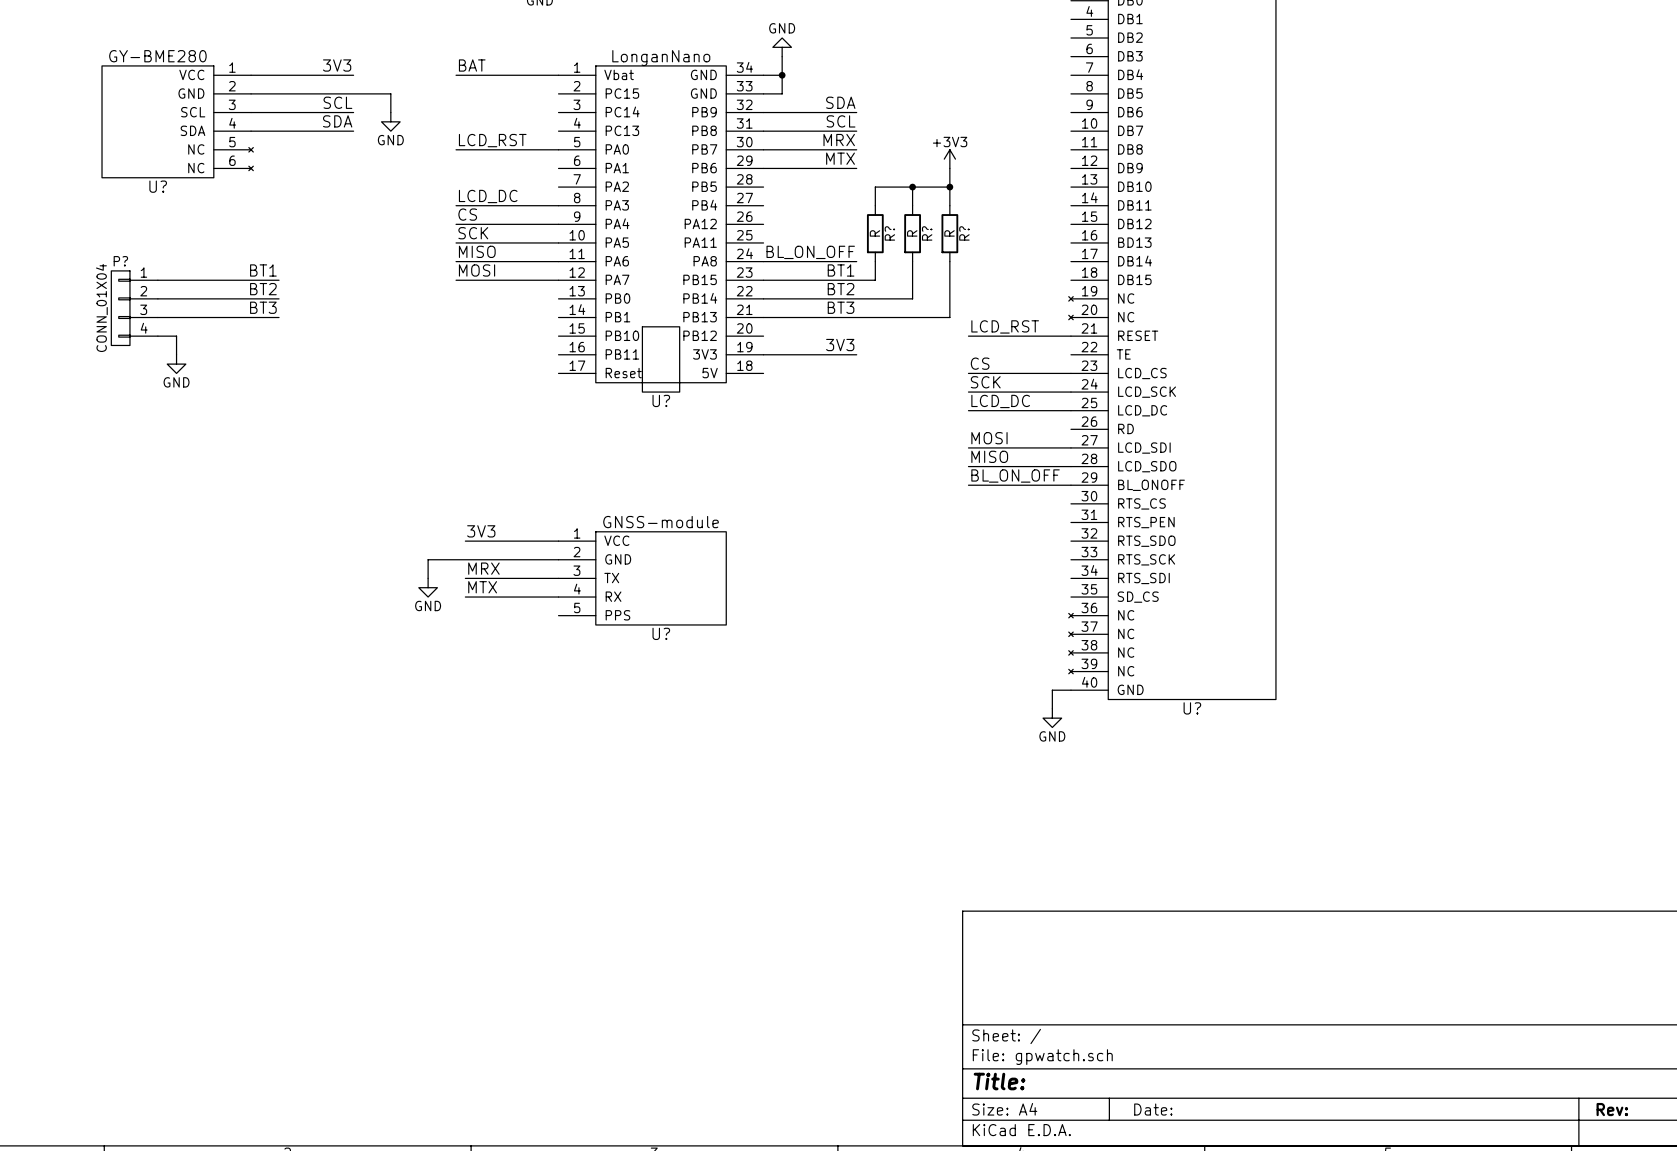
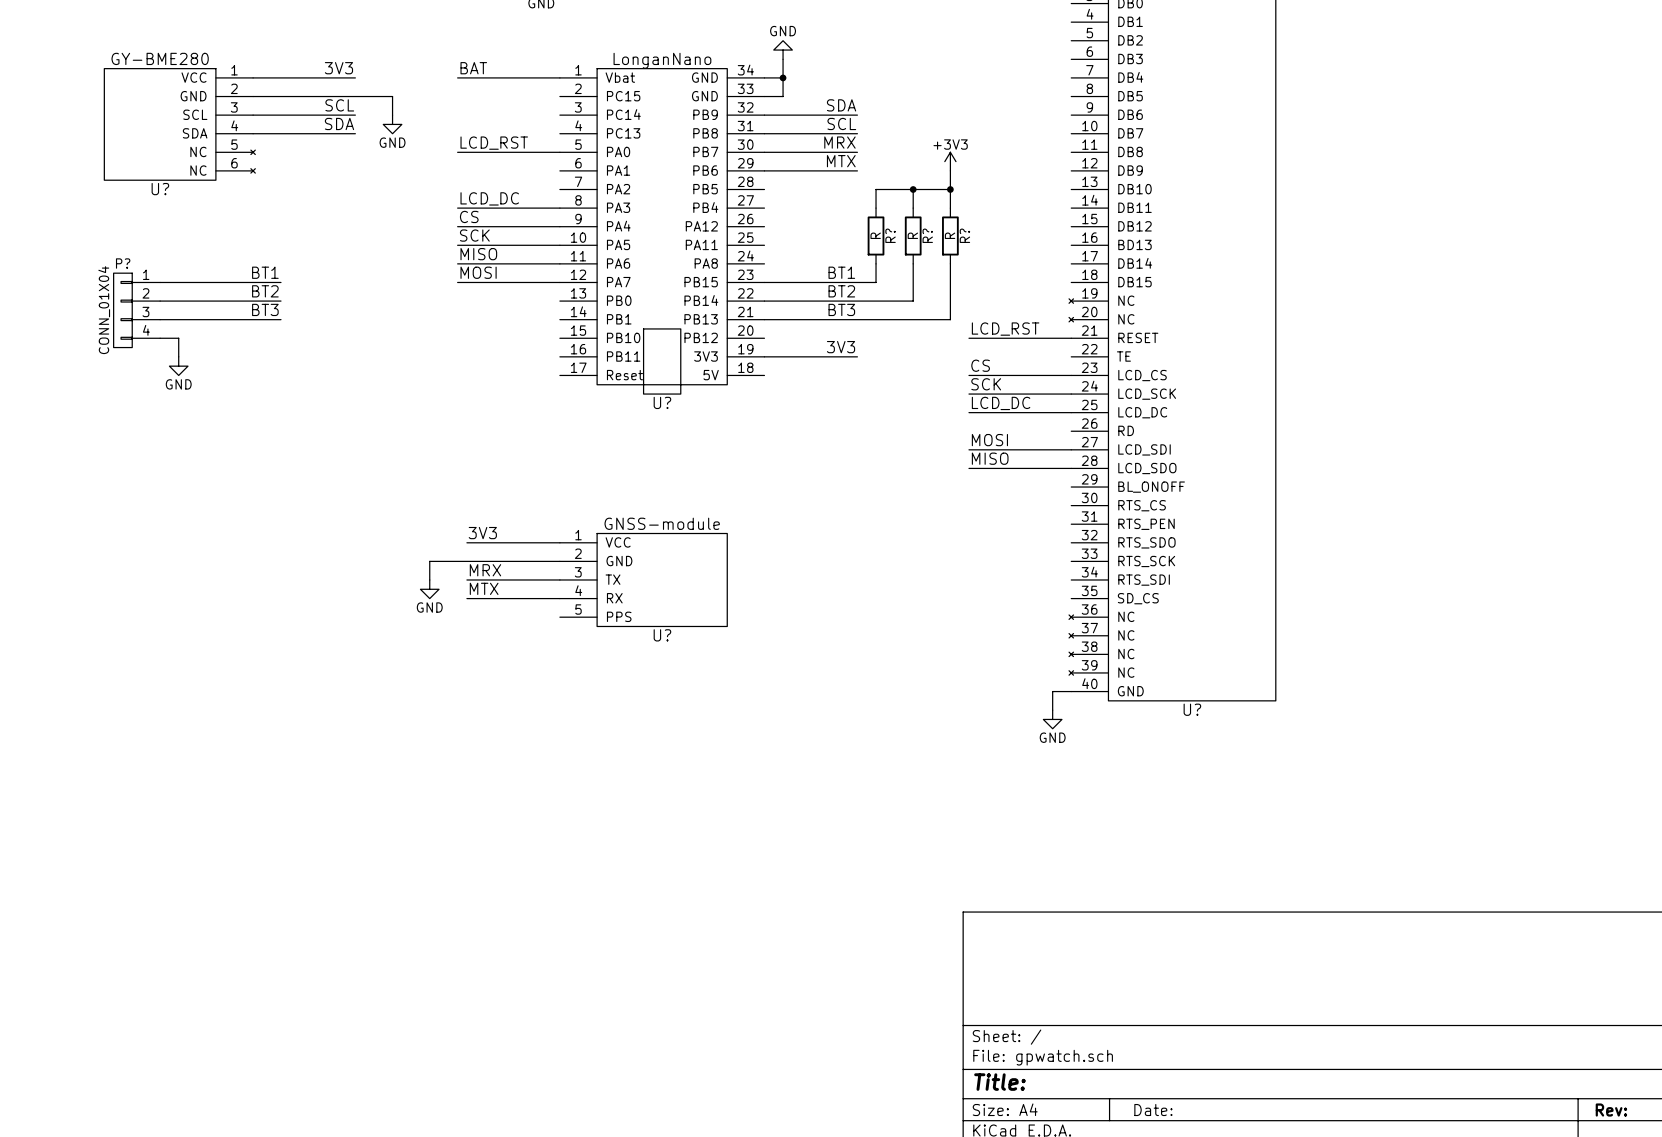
label: BL_ON_OFF (810, 252) -> none
wire: (763, 261) (856, 261) -> none
label: BL_ON_OFF (1015, 475) -> none
wire: (968, 485) (1070, 485) -> none

